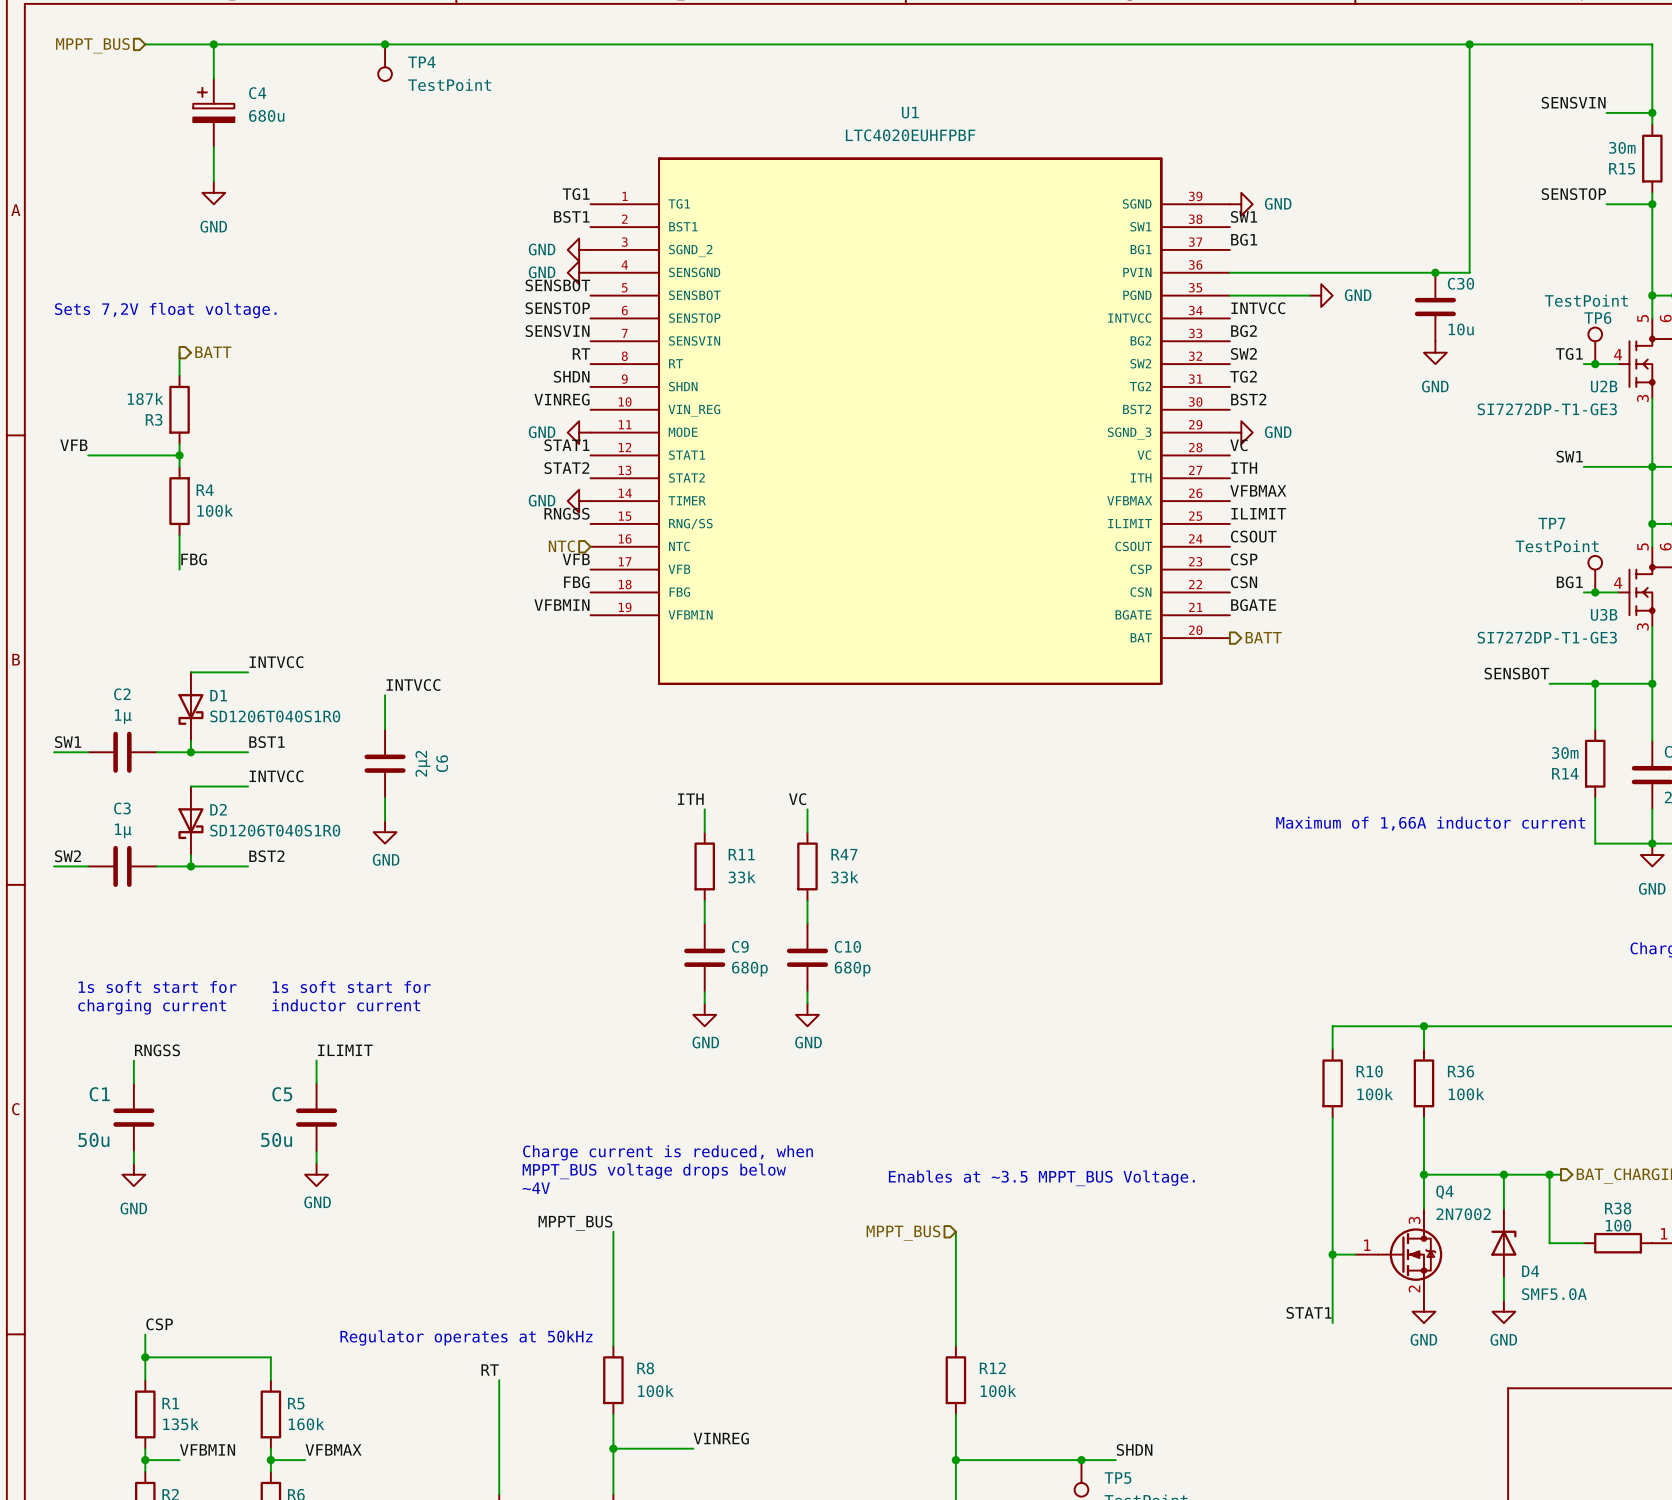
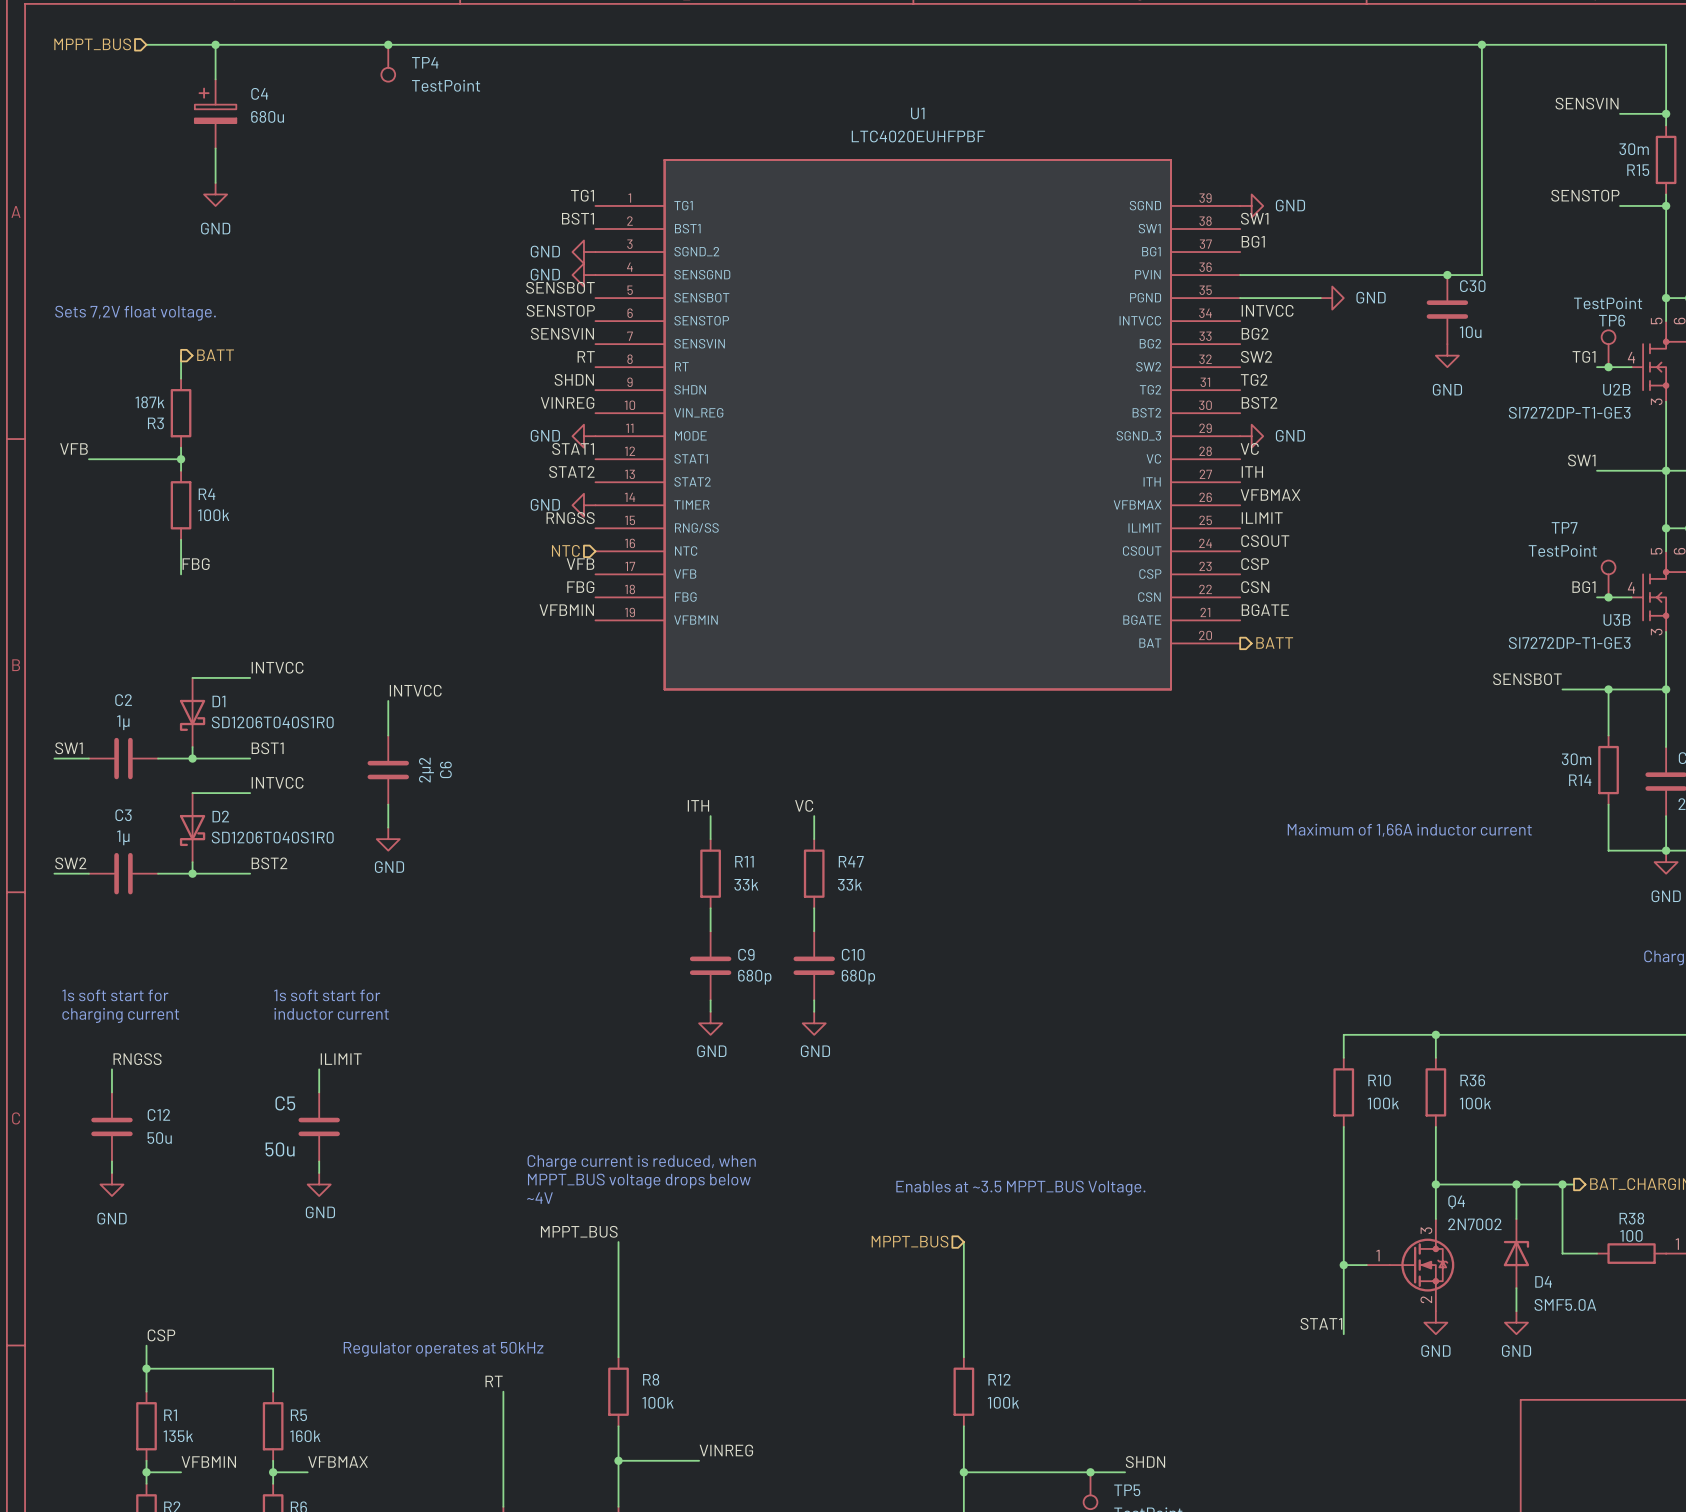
text position: 1s soft start for (157, 986) -> 1s soft start for (115, 995)
text position: charging current (152, 1006) -> charging current (120, 1015)
label position: RNGSS (157, 1050) -> RNGSS (137, 1059)
wire: (133, 1060) (133, 1083) -> (111, 1069) (111, 1092)
C12: none -> 50u (111, 1126)
C1: 50u (133, 1117) -> none
wire: (133, 1151) (133, 1163) -> (111, 1161) (111, 1172)
power symbol position: GND (133, 1174) -> GND (111, 1184)

